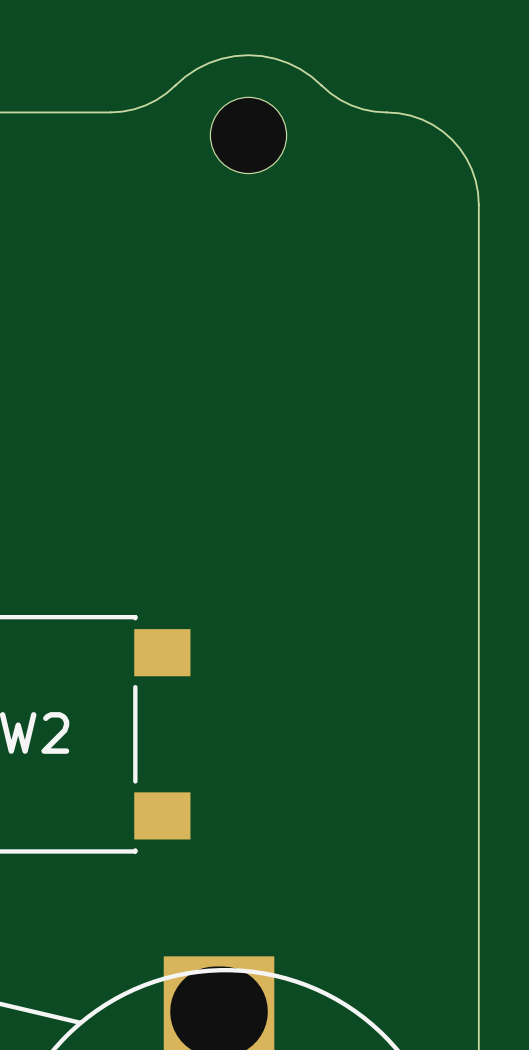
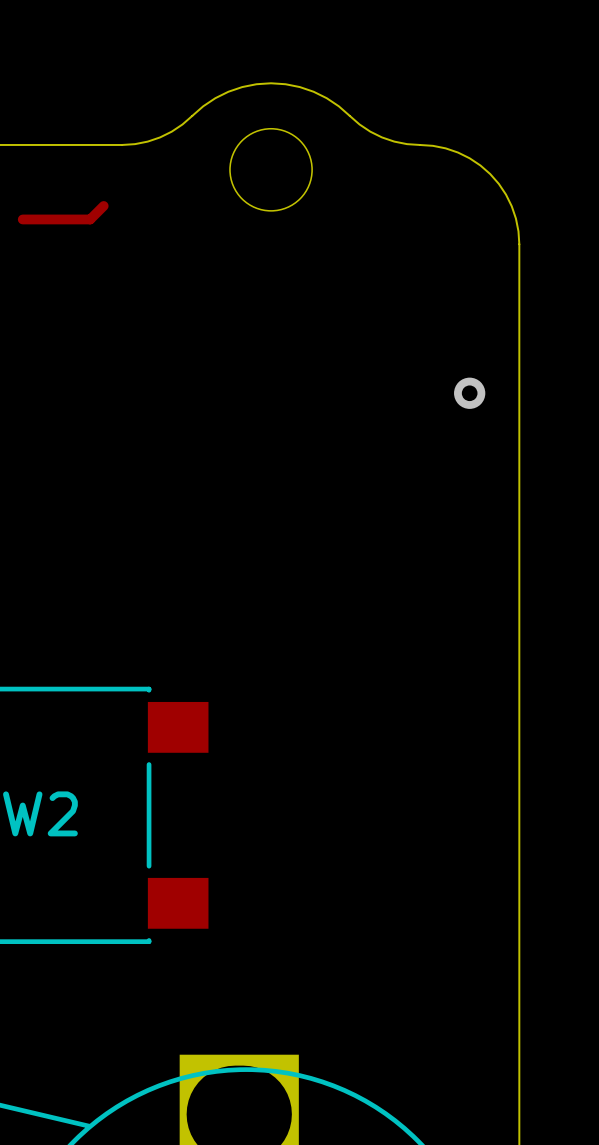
track: none -> (103, 205) (90, 219) (22, 219)
via: none -> (469, 393)

